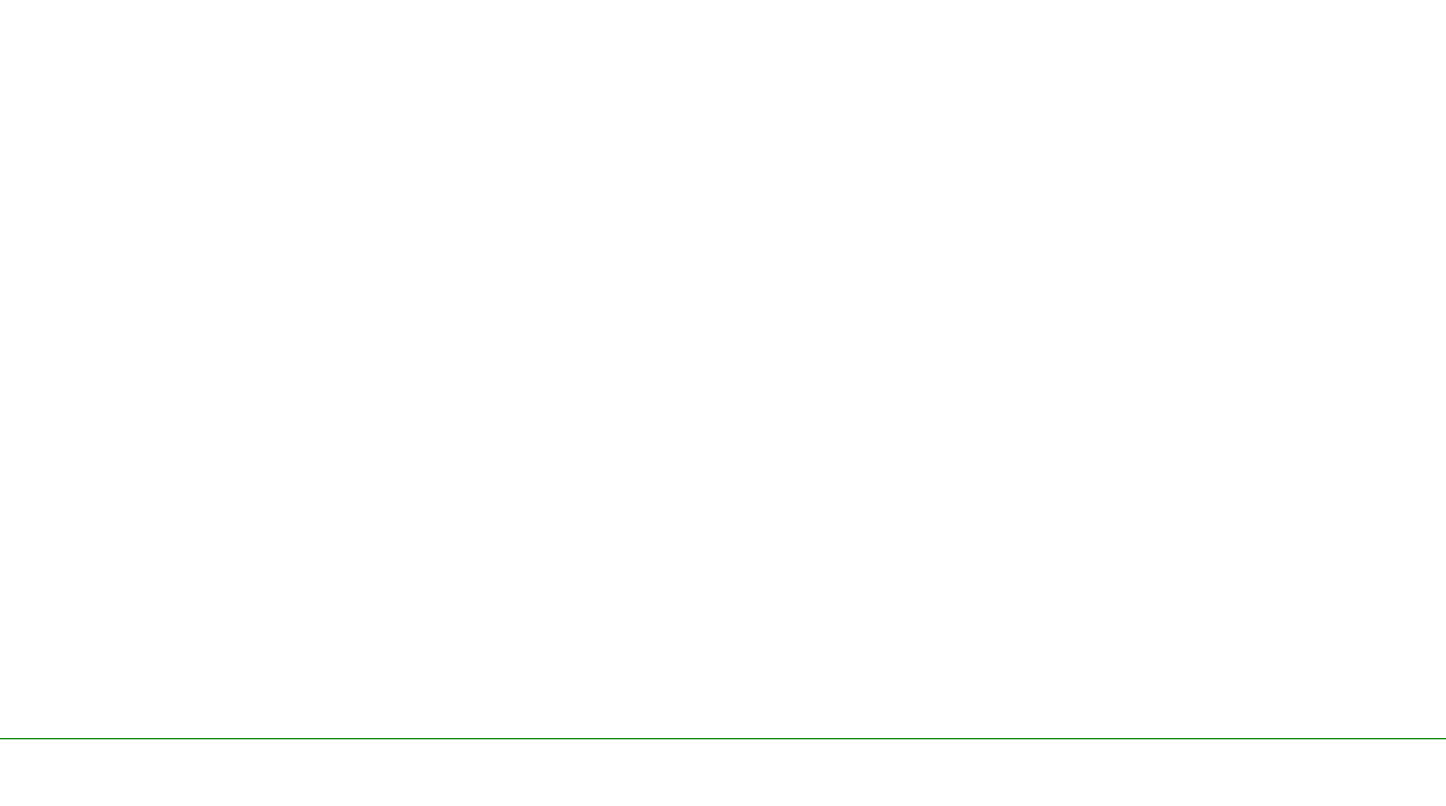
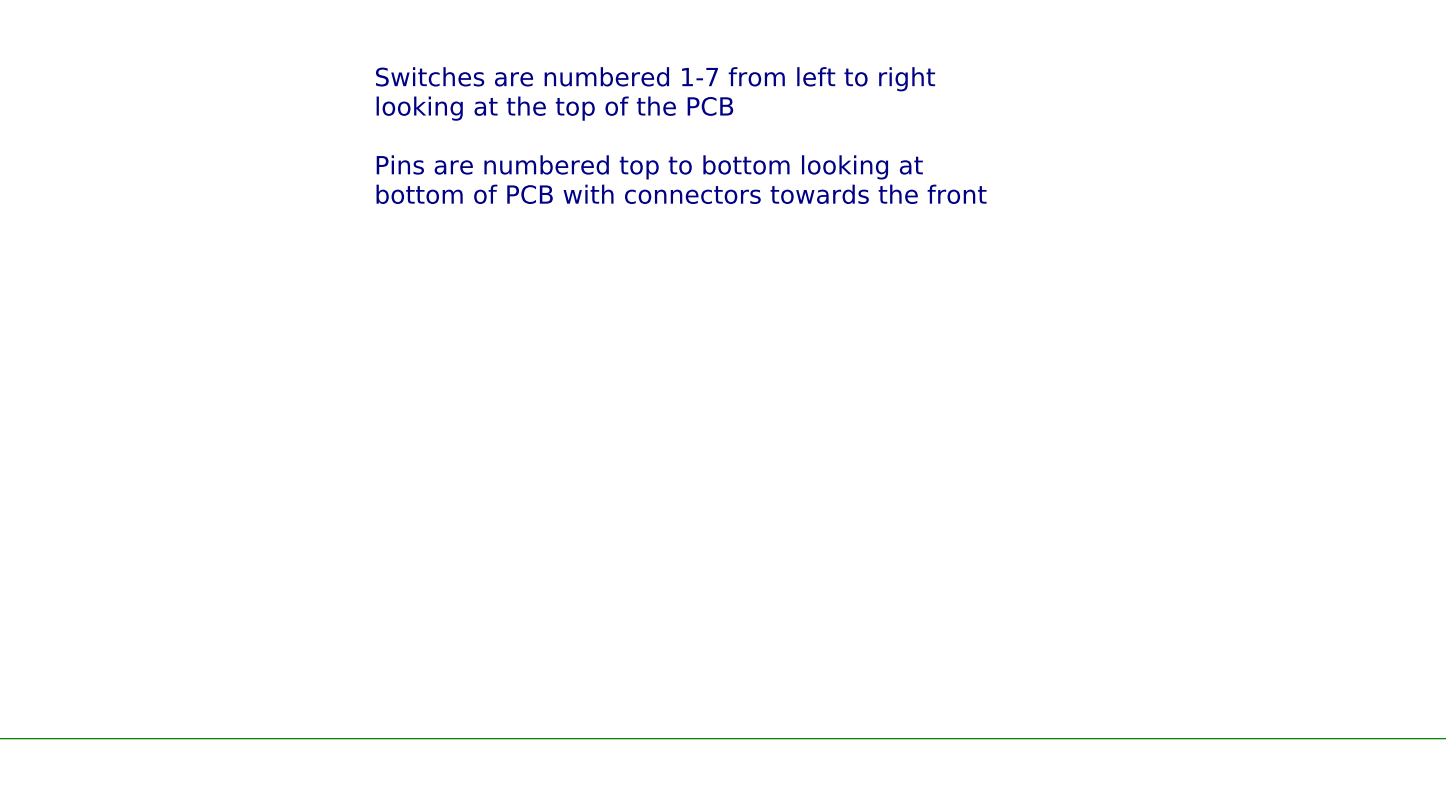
text: none -> Switches are numbered 1-7 from left to right (655, 79)
text: none -> looking at the top of the PCB (554, 108)
text: none -> Pins are numbered top to bottom looking at (649, 167)
text: none -> bottom of PCB with connectors towards the front (681, 194)

